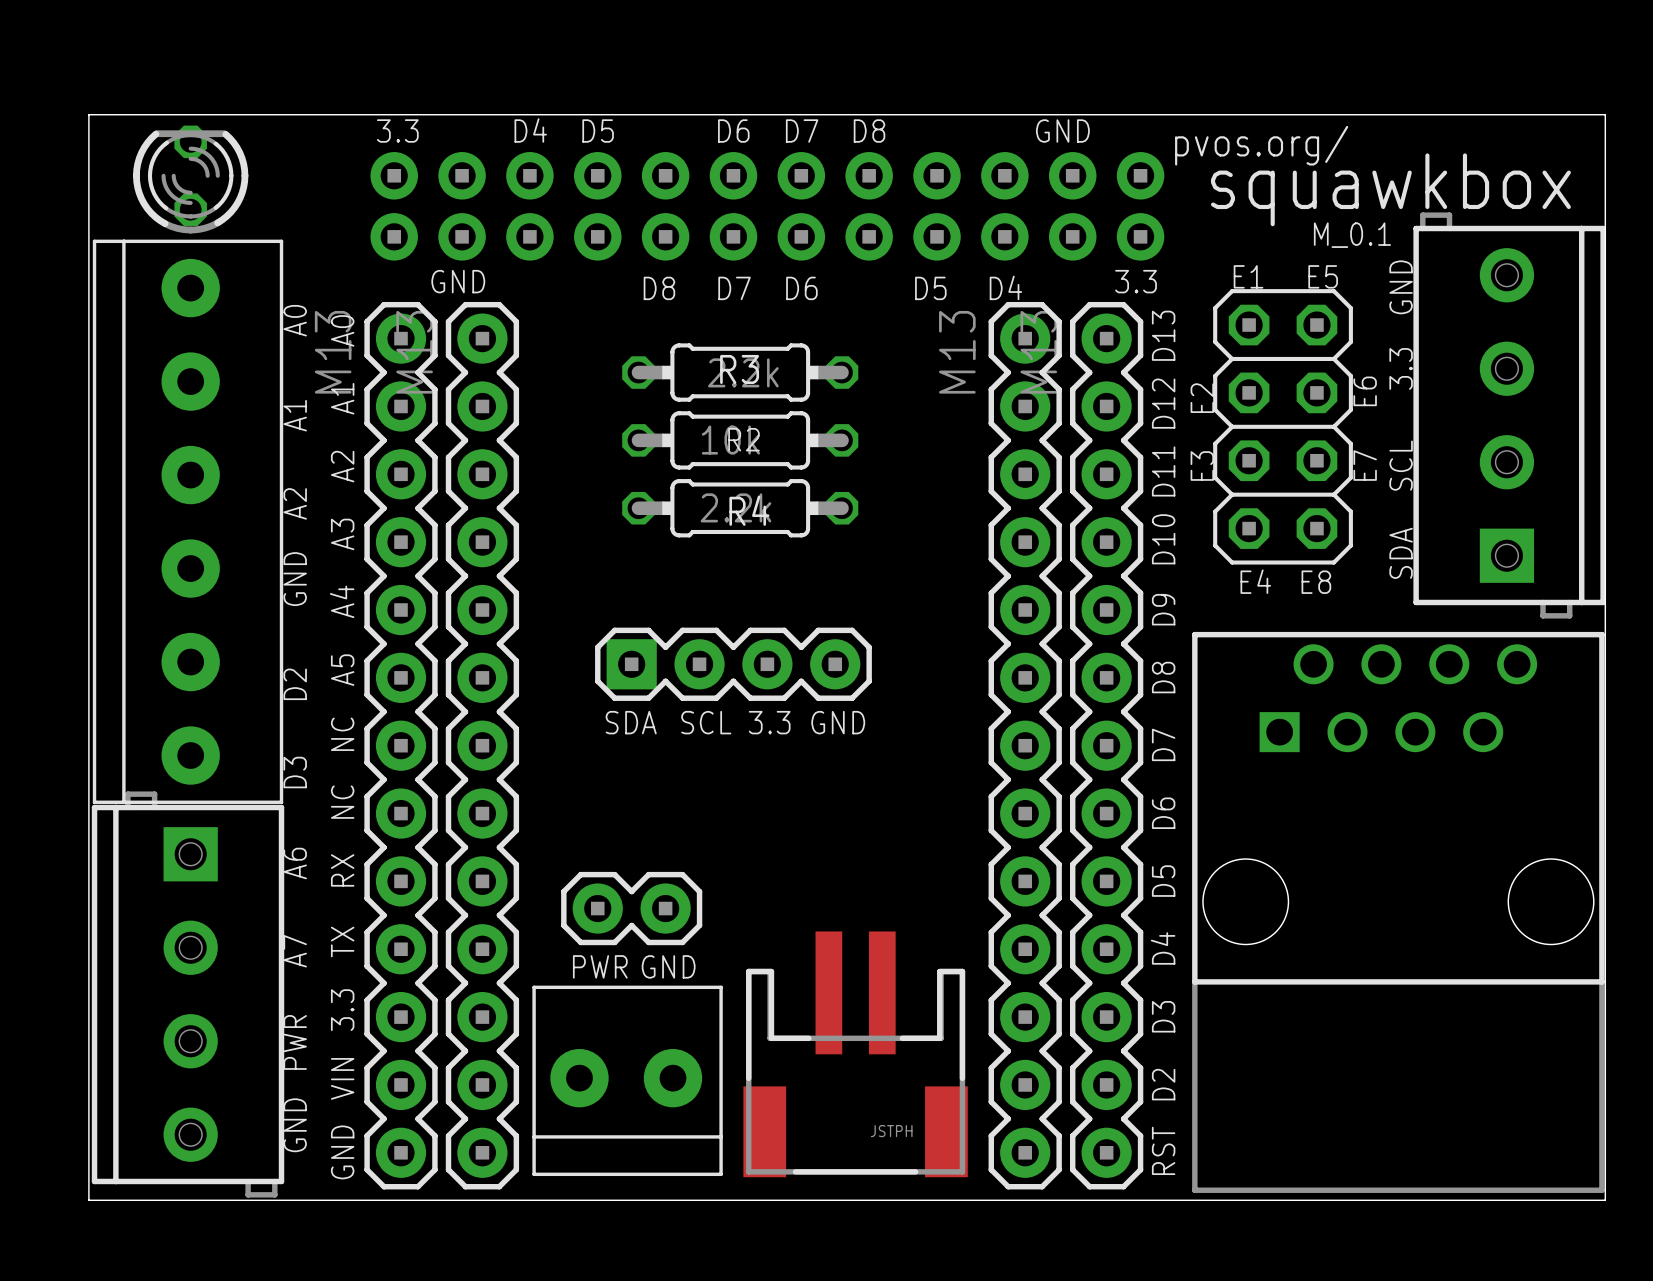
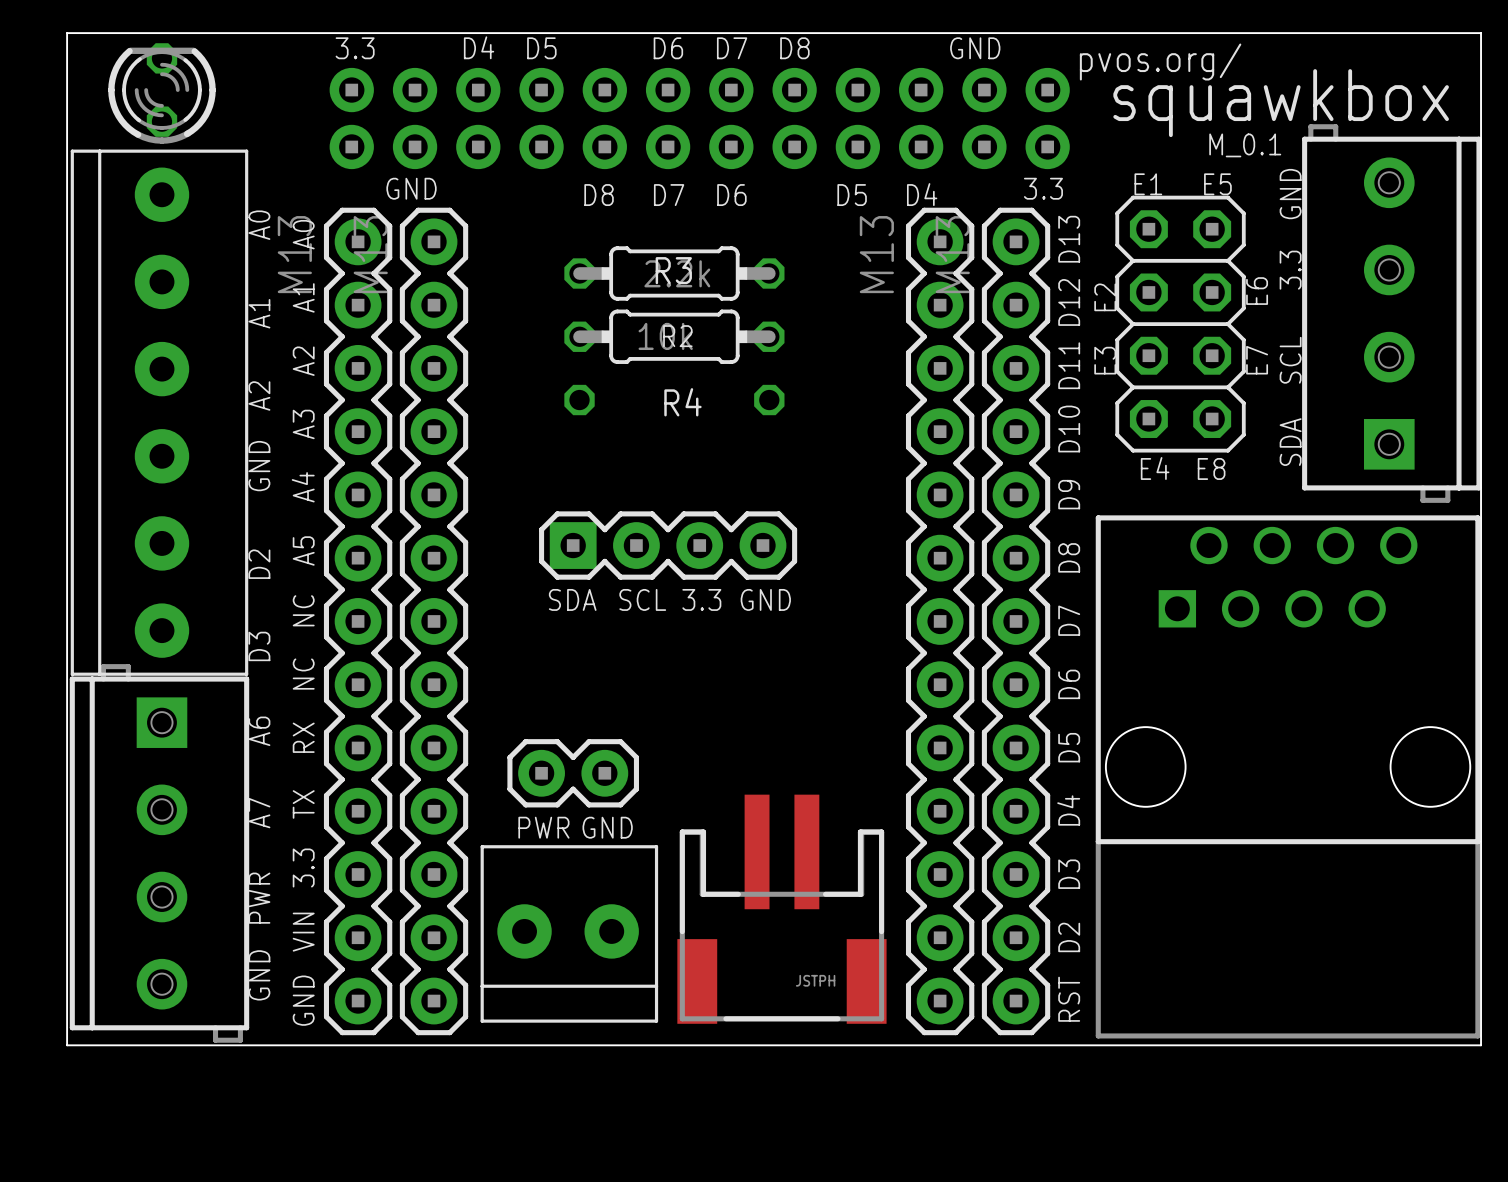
R4 side: top (740, 508) -> bottom (674, 400)

